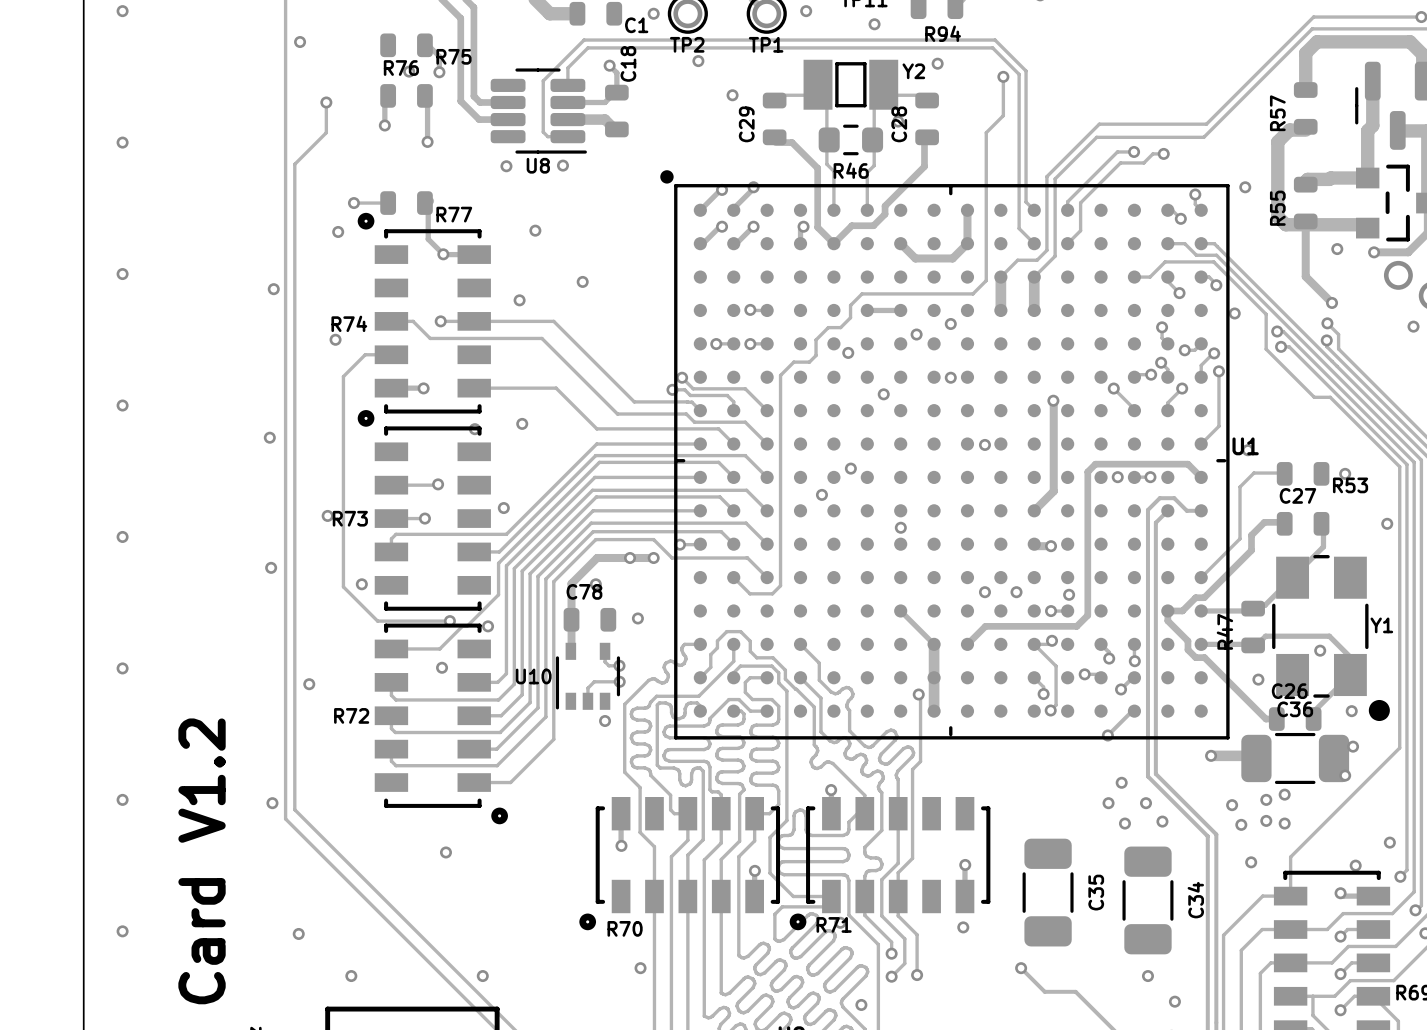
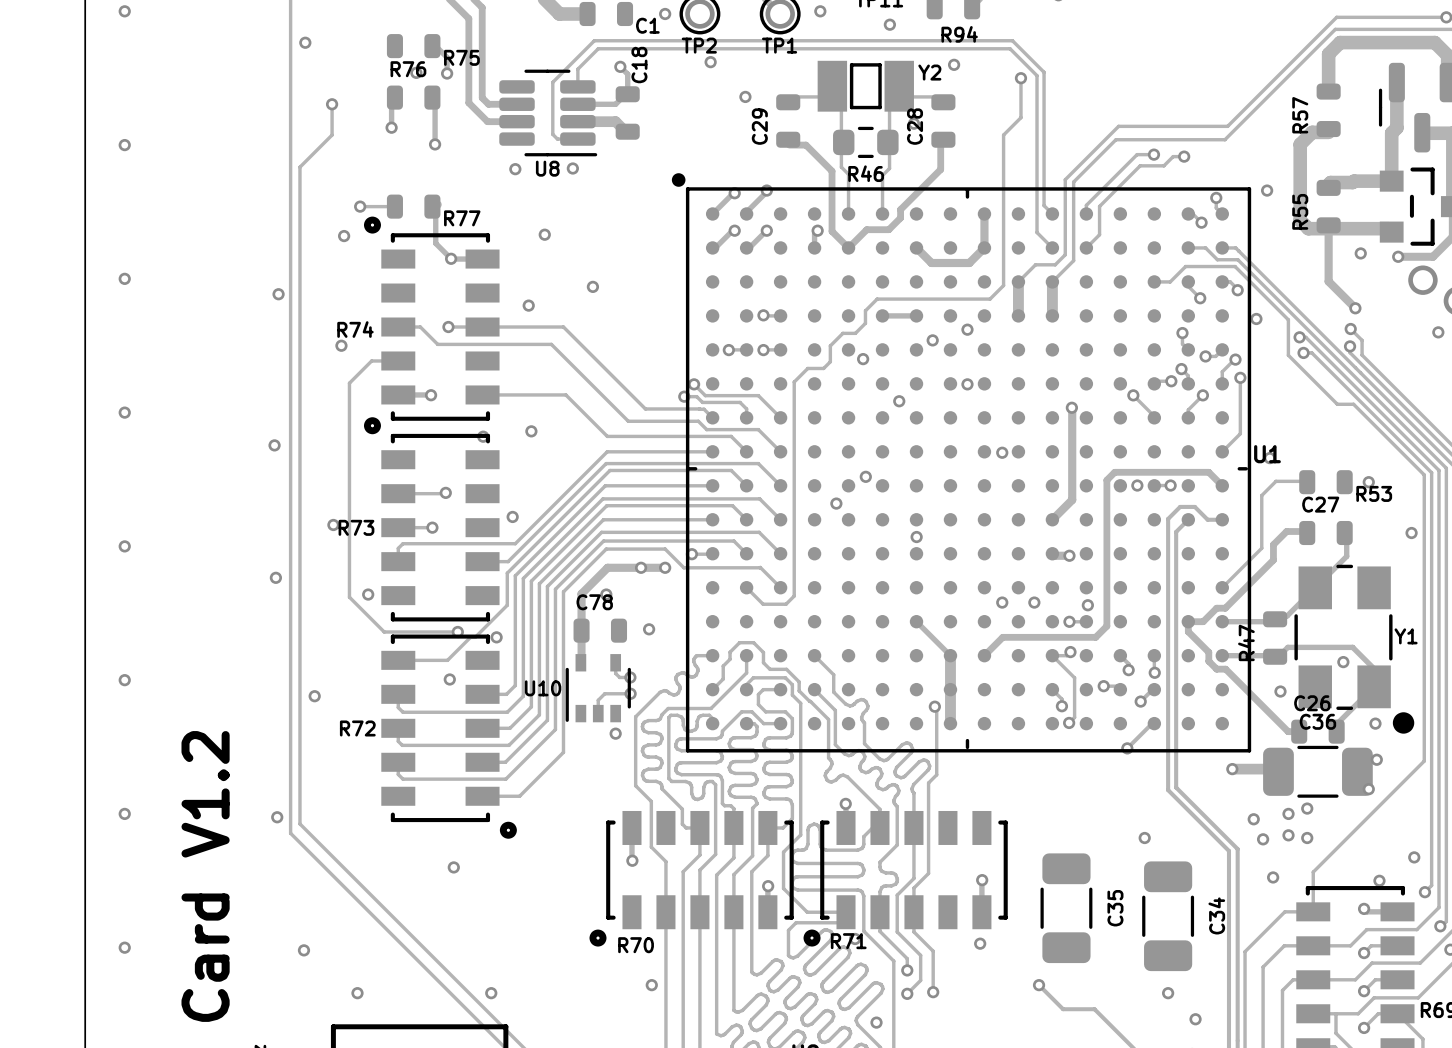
via: (1121, 782) -> none
via: (1108, 803) -> none
via: (1146, 803) -> none
via: (1162, 821) -> none

